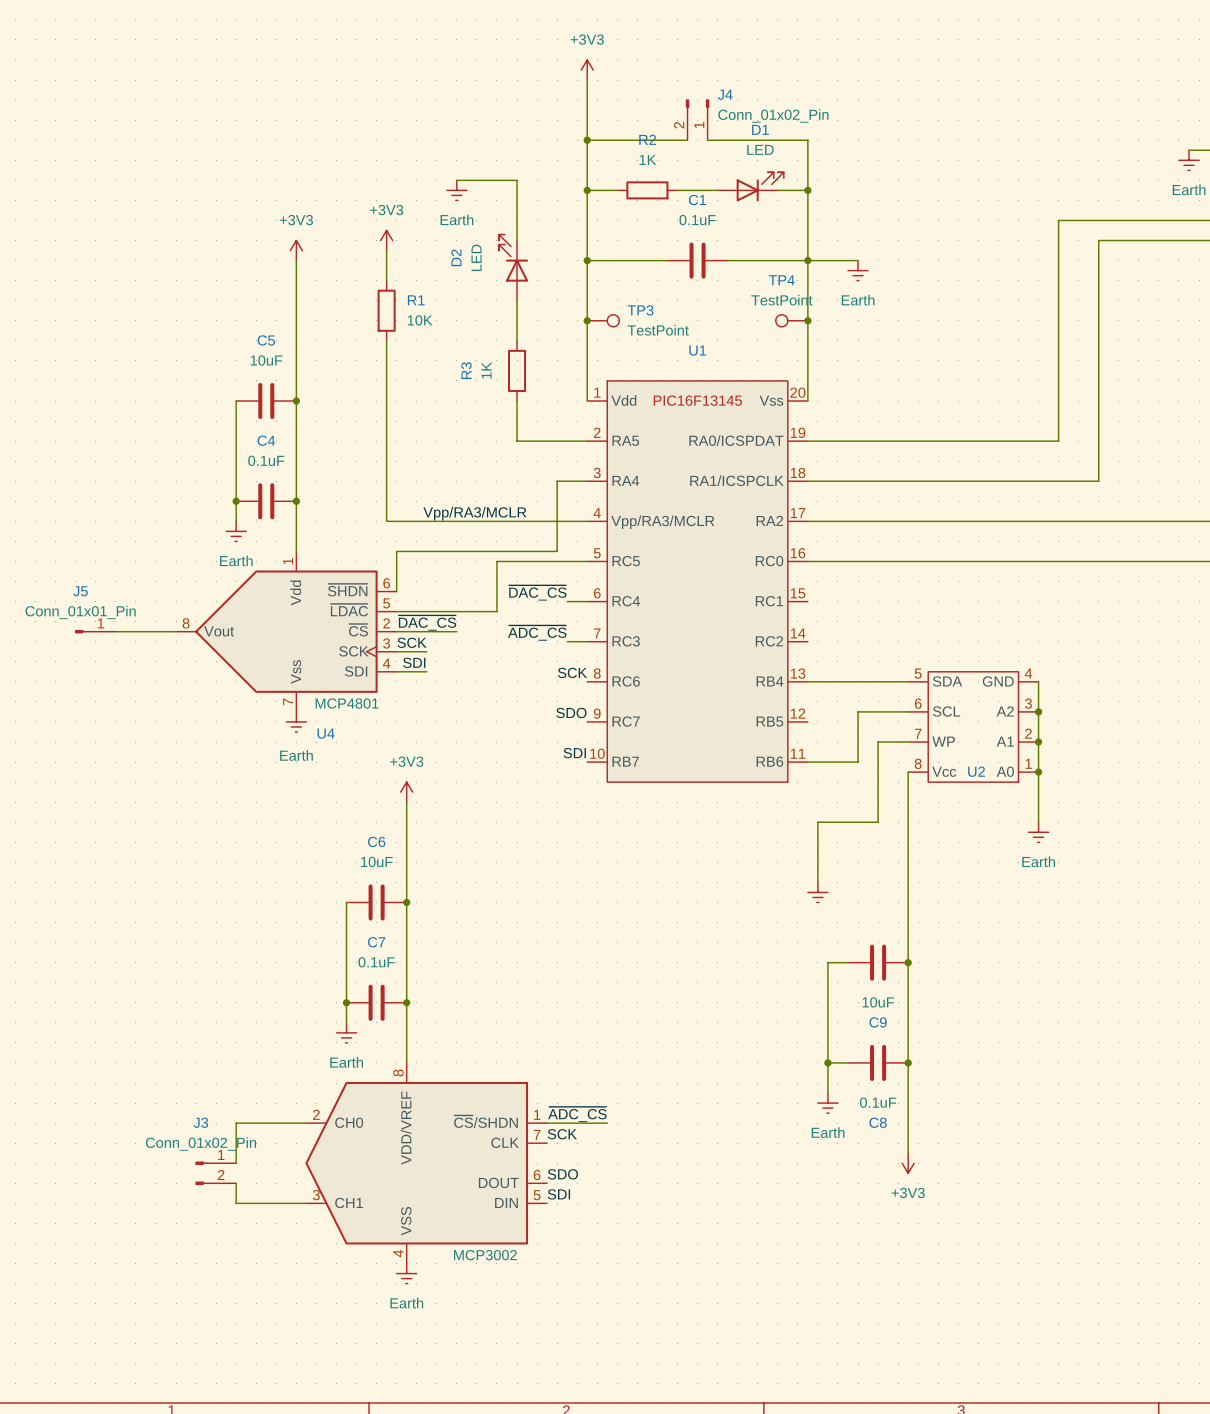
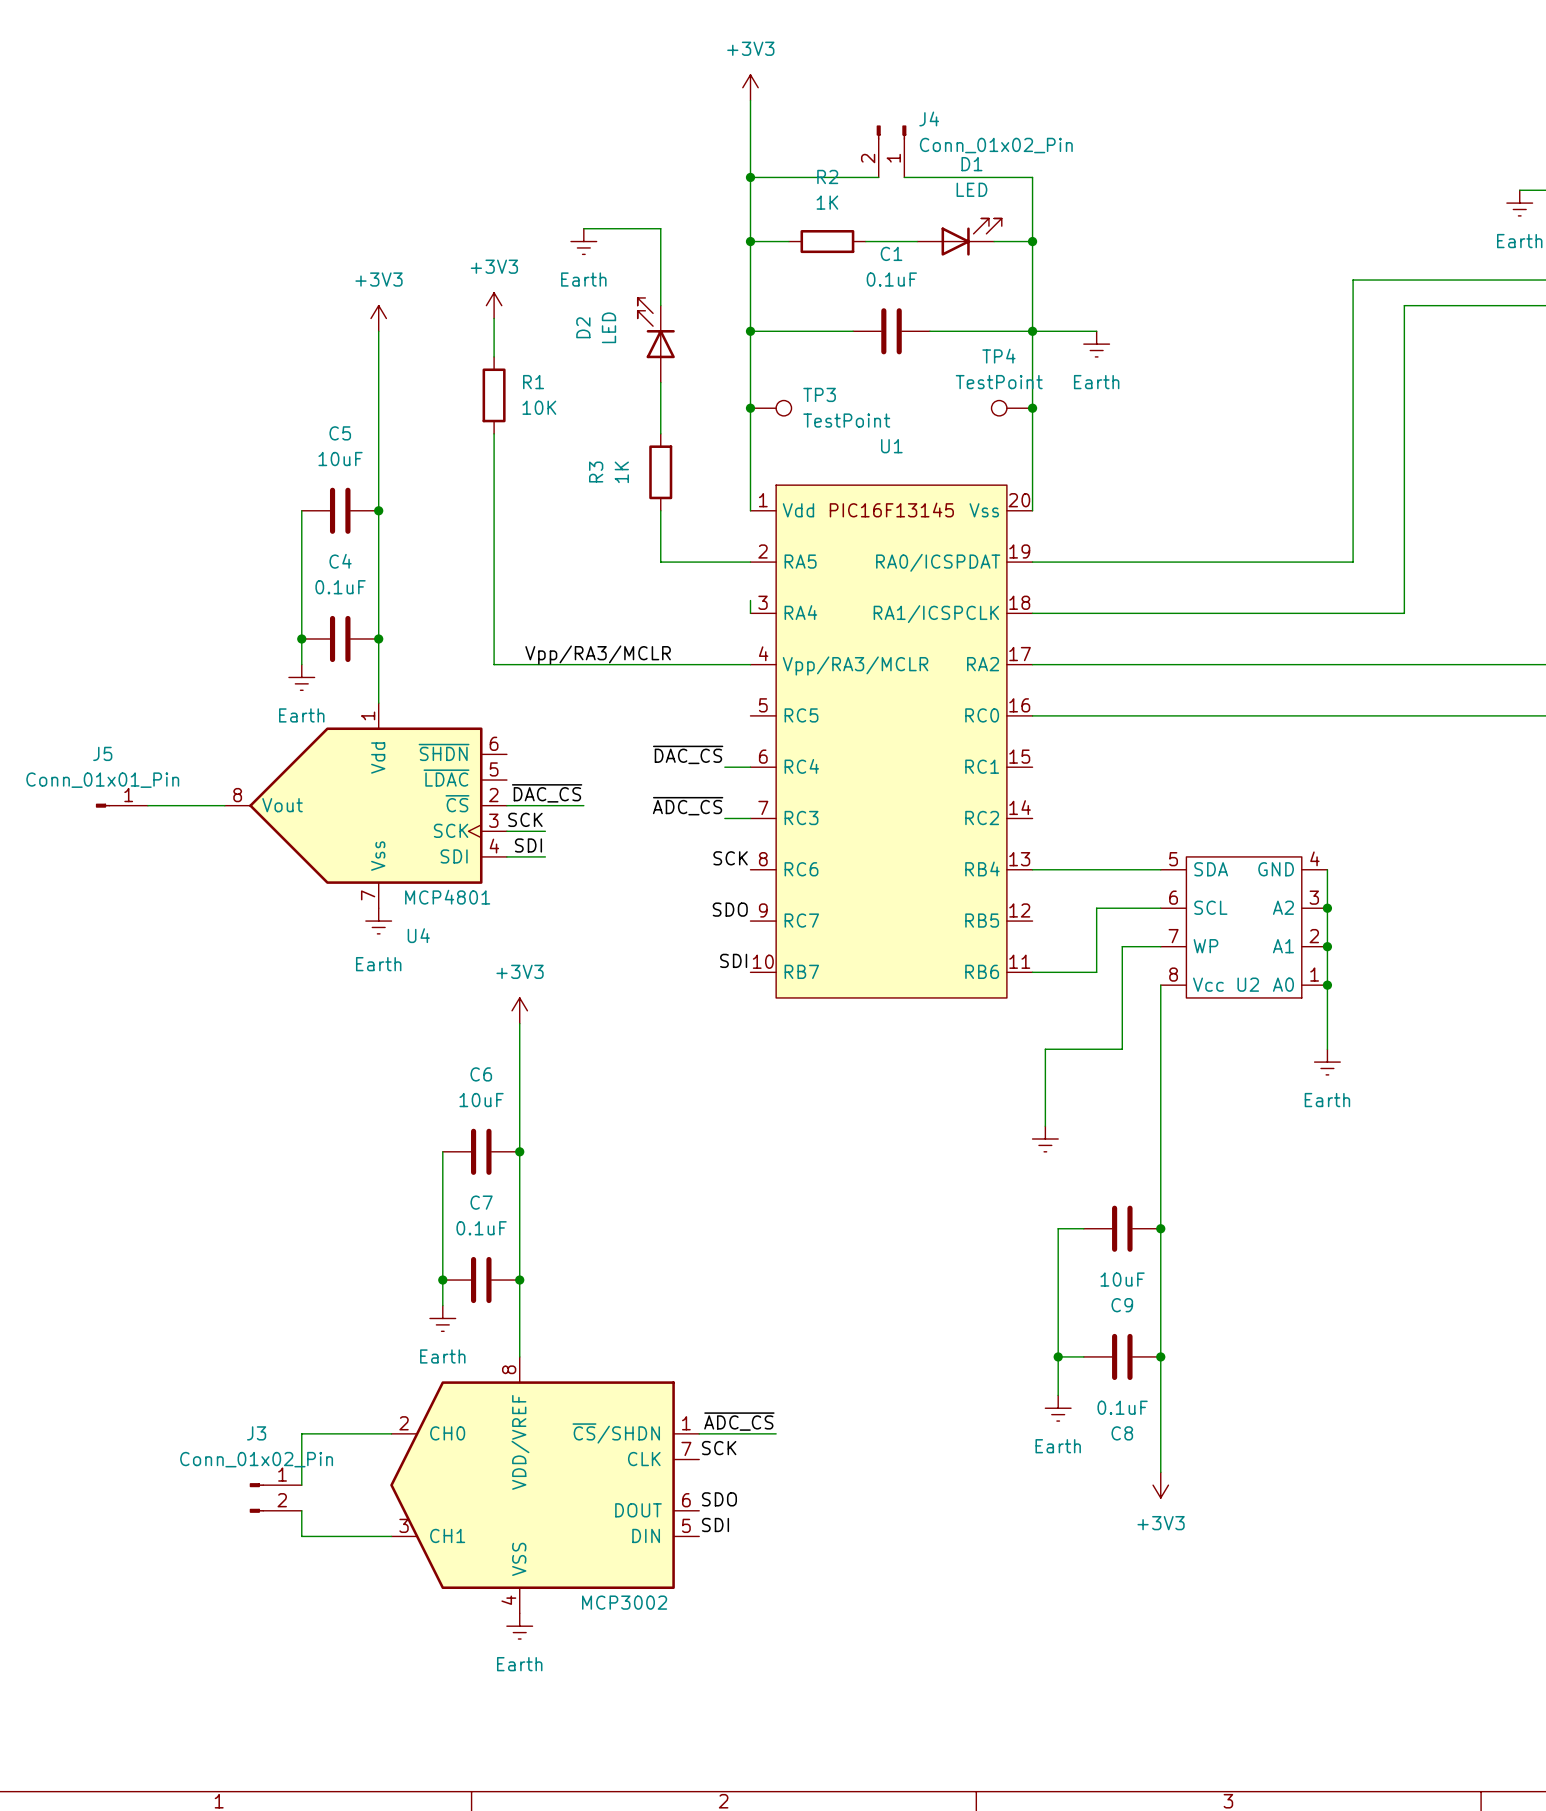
wire: (587, 481) (557, 481) (557, 551) (396, 551) (396, 591) -> (750, 613) (750, 600)
wire: (587, 561) (496, 561) (496, 611) (396, 611) -> none

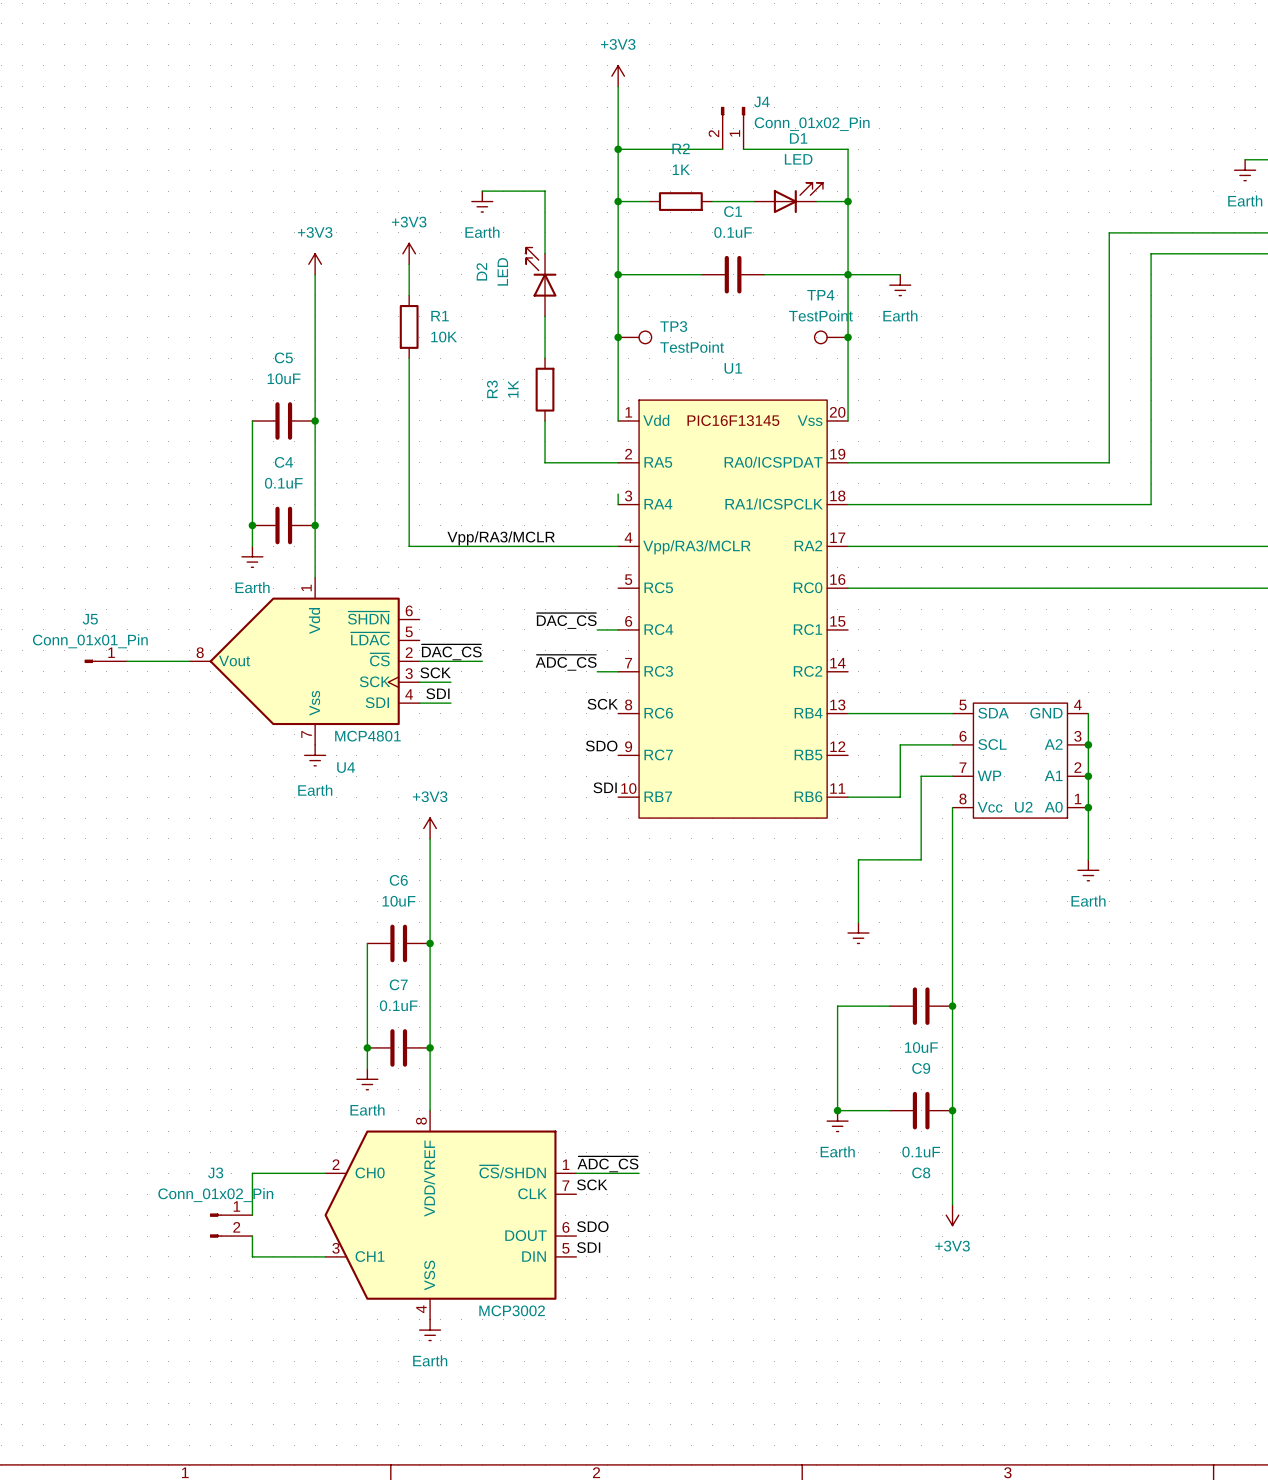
wire: (1058, 1228) (1058, 1395) -> (868, 1006) (837, 1006) (837, 1110) (868, 1110)
junction position: (1058, 1356) -> (837, 1110)
power symbol position: Earth (1058, 1408) -> Earth (837, 1121)

